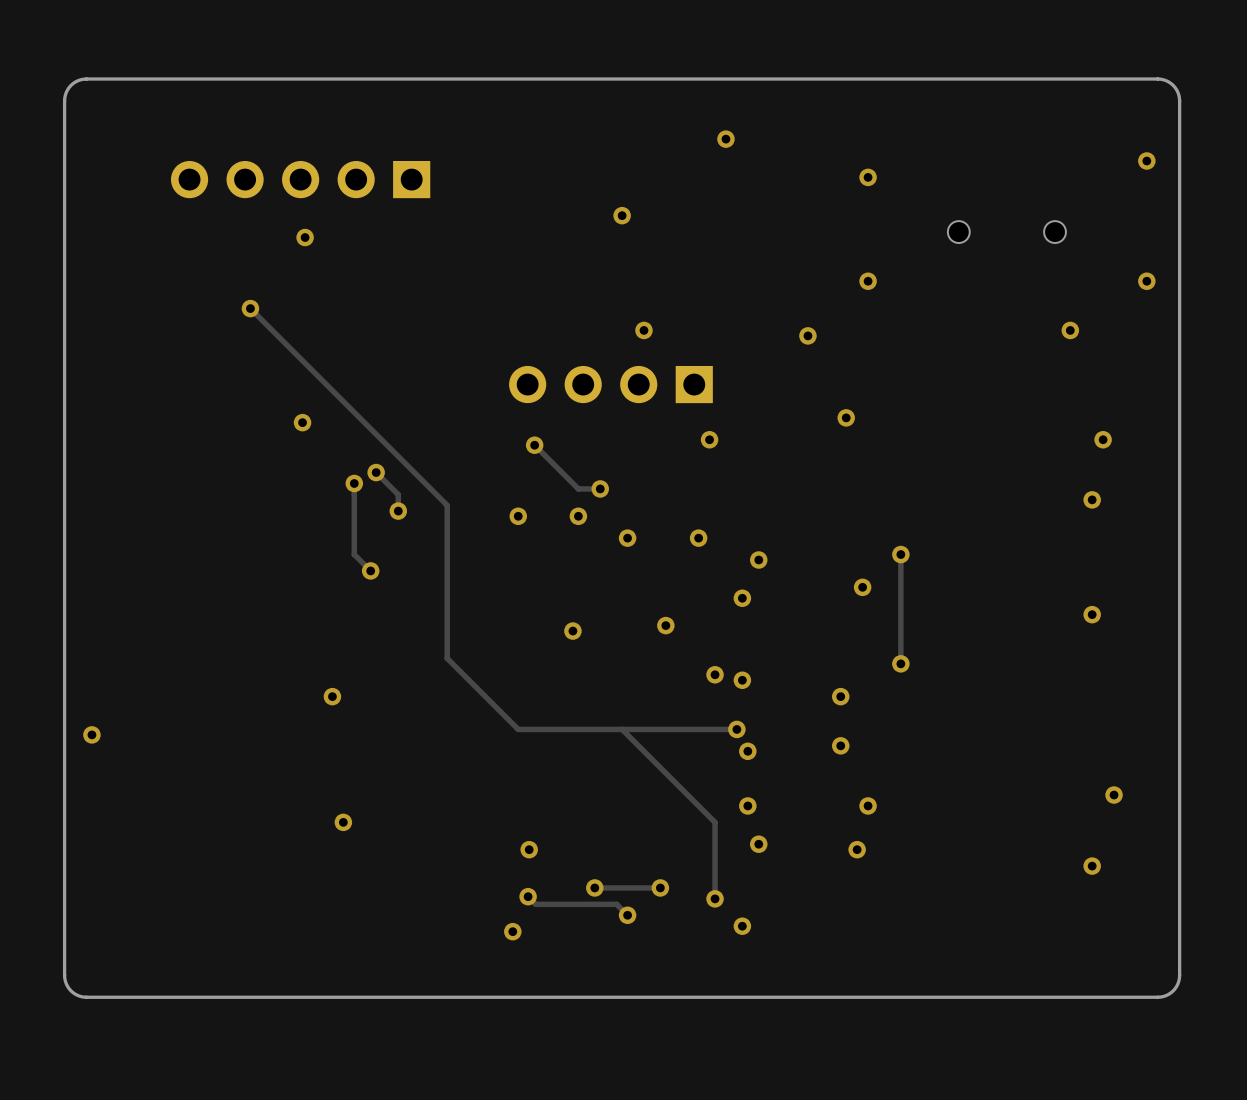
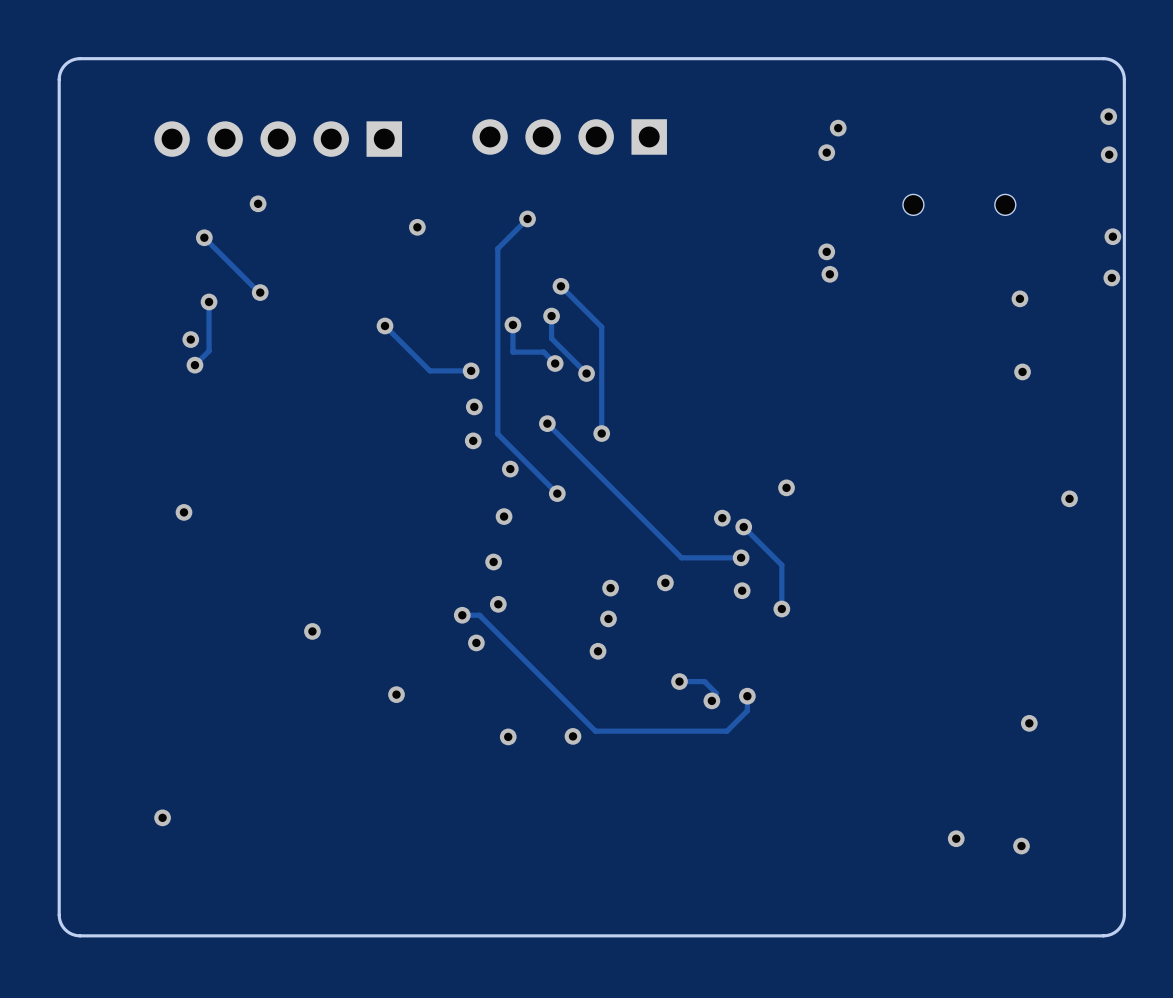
via: (725, 139) -> none
via: none -> (1108, 116)
via: none -> (838, 128)
via: (1146, 161) -> none
part position: (300, 179) -> (278, 139)
via: none -> (1109, 154)
via: (622, 215) -> none
via position: (305, 237) -> (258, 203)
track: none -> (527, 218) (497, 248) (497, 434) (557, 493)
via: none -> (527, 218)
via: none -> (417, 227)
via: none -> (1112, 236)
track: none -> (204, 237) (260, 292)
via: none -> (204, 237)
via: (1146, 281) -> none
via: none -> (829, 274)
track: (250, 308) (447, 505) (447, 658) (518, 729) (736, 729) -> none
via: (250, 308) -> none
via: none -> (1111, 277)
track: none -> (560, 286) (601, 327) (601, 433)
via: none -> (560, 286)
via: none -> (260, 292)
via: (643, 330) -> none
track: none -> (209, 301) (209, 351) (194, 365)
via: none -> (209, 301)
via: (807, 335) -> none
track: none -> (551, 316) (551, 338) (586, 373)
via: none -> (551, 316)
track: none -> (512, 324) (512, 352) (543, 352) (555, 363)
via: none -> (512, 324)
track: none -> (385, 325) (429, 370) (471, 370)
via: none -> (385, 325)
via: none -> (190, 339)
part position: (610, 384) -> (569, 136)
via: none -> (555, 363)
via: none -> (194, 365)
via: none -> (471, 370)
via: none -> (586, 373)
via: (846, 417) -> none
via: (302, 422) -> none
via: (709, 439) -> none
via position: (1103, 439) -> (1022, 371)
via: none -> (474, 406)
track: (534, 445) (578, 488) (600, 488) -> none
via: (534, 445) -> none
track: none -> (547, 423) (681, 557) (741, 557)
via: none -> (547, 423)
via: none -> (601, 433)
track: (376, 472) (398, 494) (398, 511) -> none
via: (376, 472) -> none
via: none -> (473, 440)
track: (354, 483) (354, 554) (370, 570) -> none
via: (354, 483) -> none
via: (600, 488) -> none
via: (1092, 499) -> none
via: (398, 511) -> none
via position: (518, 516) -> (510, 469)
via position: (578, 516) -> (557, 493)
via: none -> (786, 487)
via: (627, 538) -> none
via: (698, 538) -> none
via: none -> (1069, 498)
via: none -> (183, 512)
track: (900, 554) (900, 663) -> none
via: (900, 554) -> none
via: none -> (504, 516)
track: none -> (743, 527) (781, 565) (781, 608)
via: none -> (743, 527)
via: (370, 570) -> none
via: (862, 587) -> none
via: (742, 598) -> none
via: none -> (741, 557)
via: none -> (493, 562)
via: (1092, 614) -> none
via: (665, 625) -> none
via: none -> (665, 582)
via: (572, 631) -> none
via: none -> (610, 588)
via: none -> (742, 590)
via: none -> (498, 604)
via: none -> (781, 608)
track: none -> (462, 615) (479, 615) (595, 731) (727, 731) (747, 710) (747, 696)
via: none -> (462, 615)
via: (900, 663) -> none
via: none -> (608, 618)
via: (715, 674) -> none
via: (742, 680) -> none
via: none -> (476, 642)
via position: (332, 696) -> (312, 631)
via: (840, 696) -> none
via: none -> (598, 651)
track: (622, 729) (715, 822) (715, 898) -> none
via position: (736, 729) -> (679, 681)
track: none -> (679, 681) (704, 681) (716, 693)
via: (91, 734) -> none
via: none -> (396, 694)
via: (840, 745) -> none
via: none -> (747, 696)
via: none -> (572, 736)
via: none -> (508, 736)
via position: (1114, 795) -> (1029, 723)
via: (747, 805) -> none
via: (868, 805) -> none
via: (343, 822) -> none
via: (758, 844) -> none
via: (529, 849) -> none
via: (857, 849) -> none
via position: (1092, 866) -> (1021, 846)
via: none -> (162, 817)
via: (594, 887) -> none
track: (660, 887) (594, 887) -> none
via: (660, 887) -> none
via: none -> (956, 838)
track: (528, 896) (535, 904) (616, 904) (627, 915) -> none
via: (528, 896) -> none
via: (715, 898) -> none
via: (627, 915) -> none
via: (742, 926) -> none
via: (512, 931) -> none

